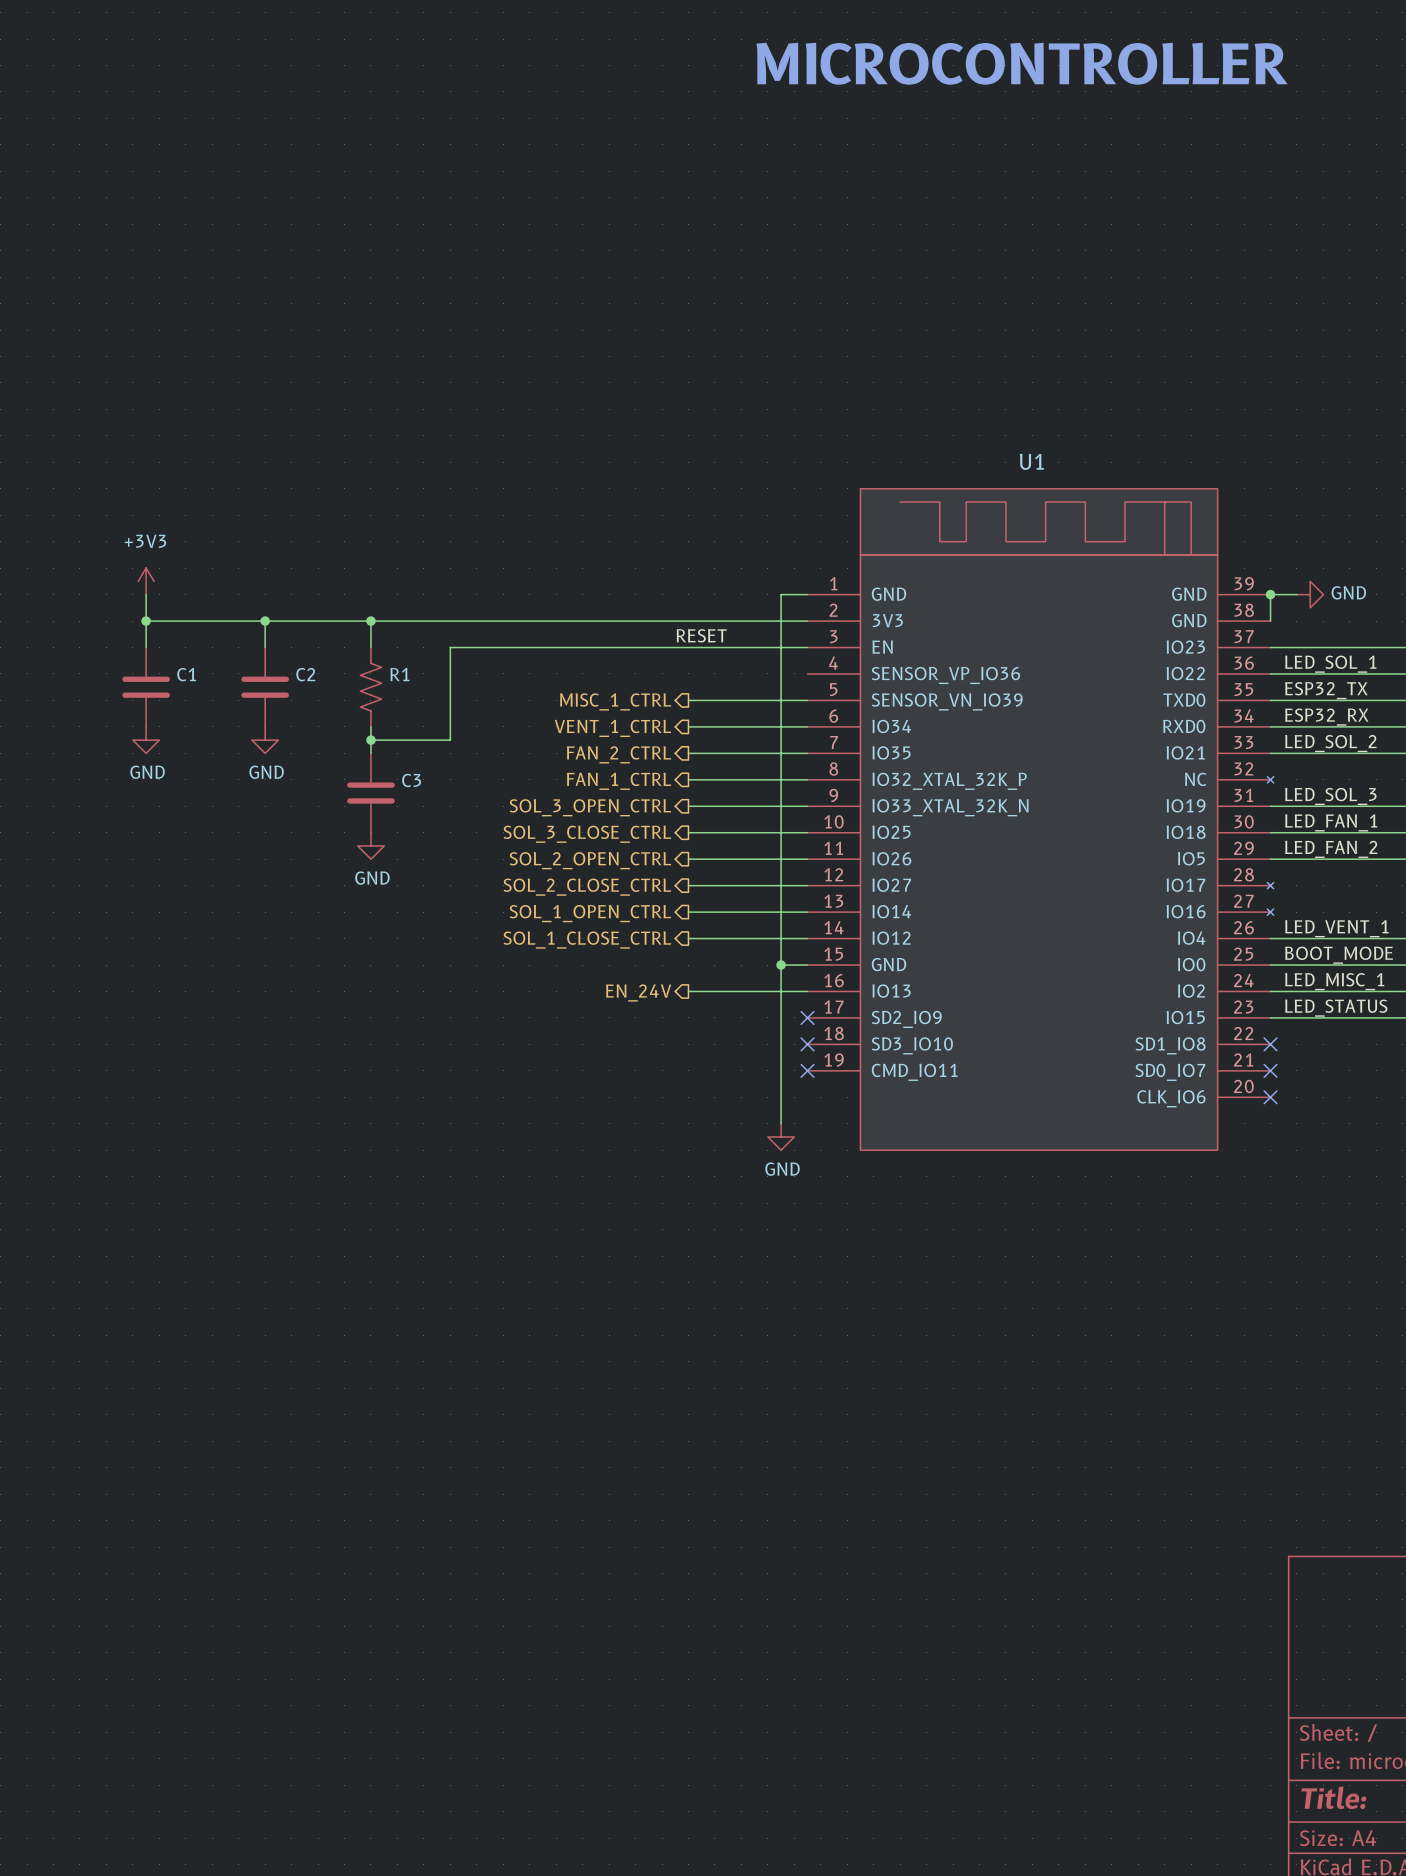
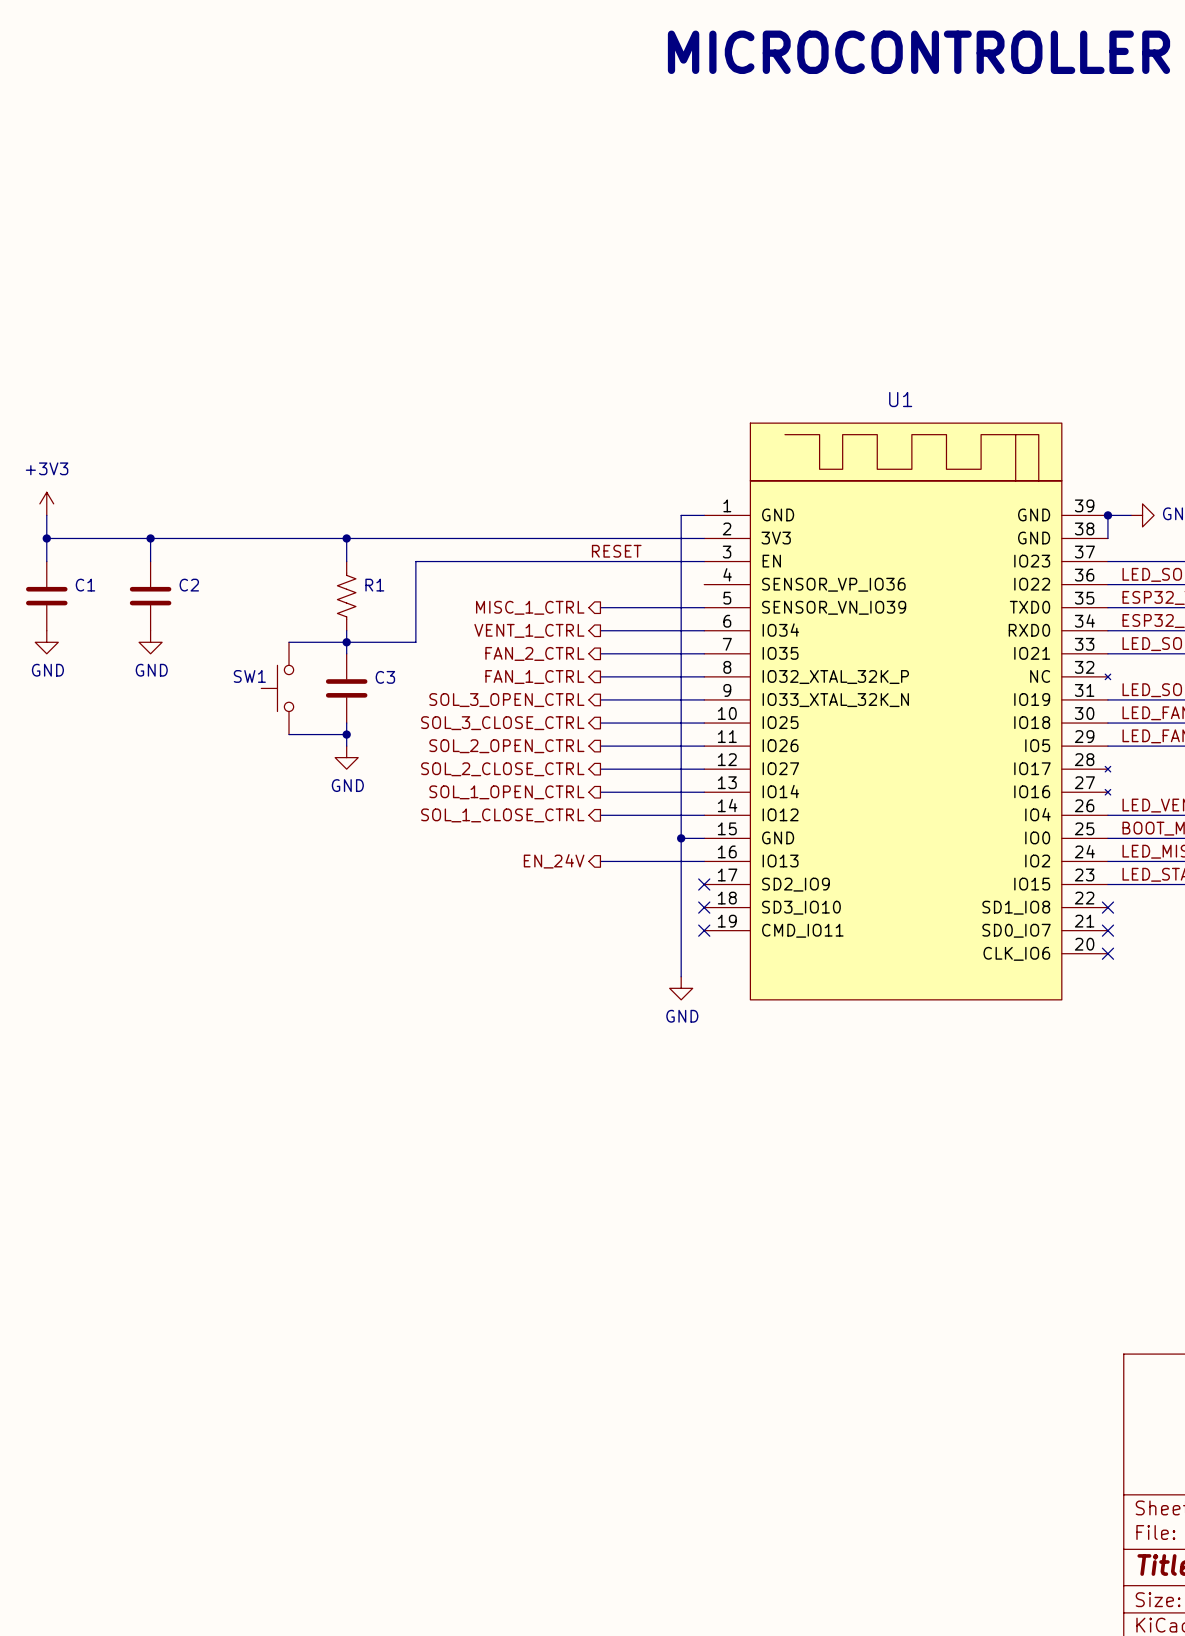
power symbol position: +3V3 (146, 581) -> +3V3 (46, 503)
wire: (146, 594) (146, 647) -> (46, 515) (46, 561)
wire: none -> (46, 538) (127, 538)
junction: none -> (46, 538)
junction position: (146, 621) -> (150, 538)
wire: (265, 621) (265, 647) -> (150, 538) (150, 561)
junction: (265, 621) -> none
wire: (370, 621) (370, 647) -> (346, 538) (346, 561)
junction position: (370, 621) -> (346, 538)
wire: (476, 647) (450, 647) (450, 740) -> (415, 561) (415, 642) (392, 642)
C1 position: (146, 687) -> (46, 596)
C2 position: (265, 687) -> (150, 596)
R1 position: (370, 687) -> (346, 596)
wire: (370, 726) (370, 753) -> (346, 630) (346, 653)
power symbol: none -> GND (46, 642)
power symbol position: GND (146, 740) -> GND (150, 642)
power symbol: GND (265, 740) -> none
wire: none -> (289, 642) (323, 642)
junction position: (370, 740) -> (346, 642)
SW1: none -> (277, 688)
C3 position: (370, 793) -> (346, 688)
wire: none -> (346, 723) (346, 746)
wire: none -> (289, 734) (346, 734)
power symbol position: GND (370, 845) -> GND (346, 757)
junction: none -> (346, 734)

